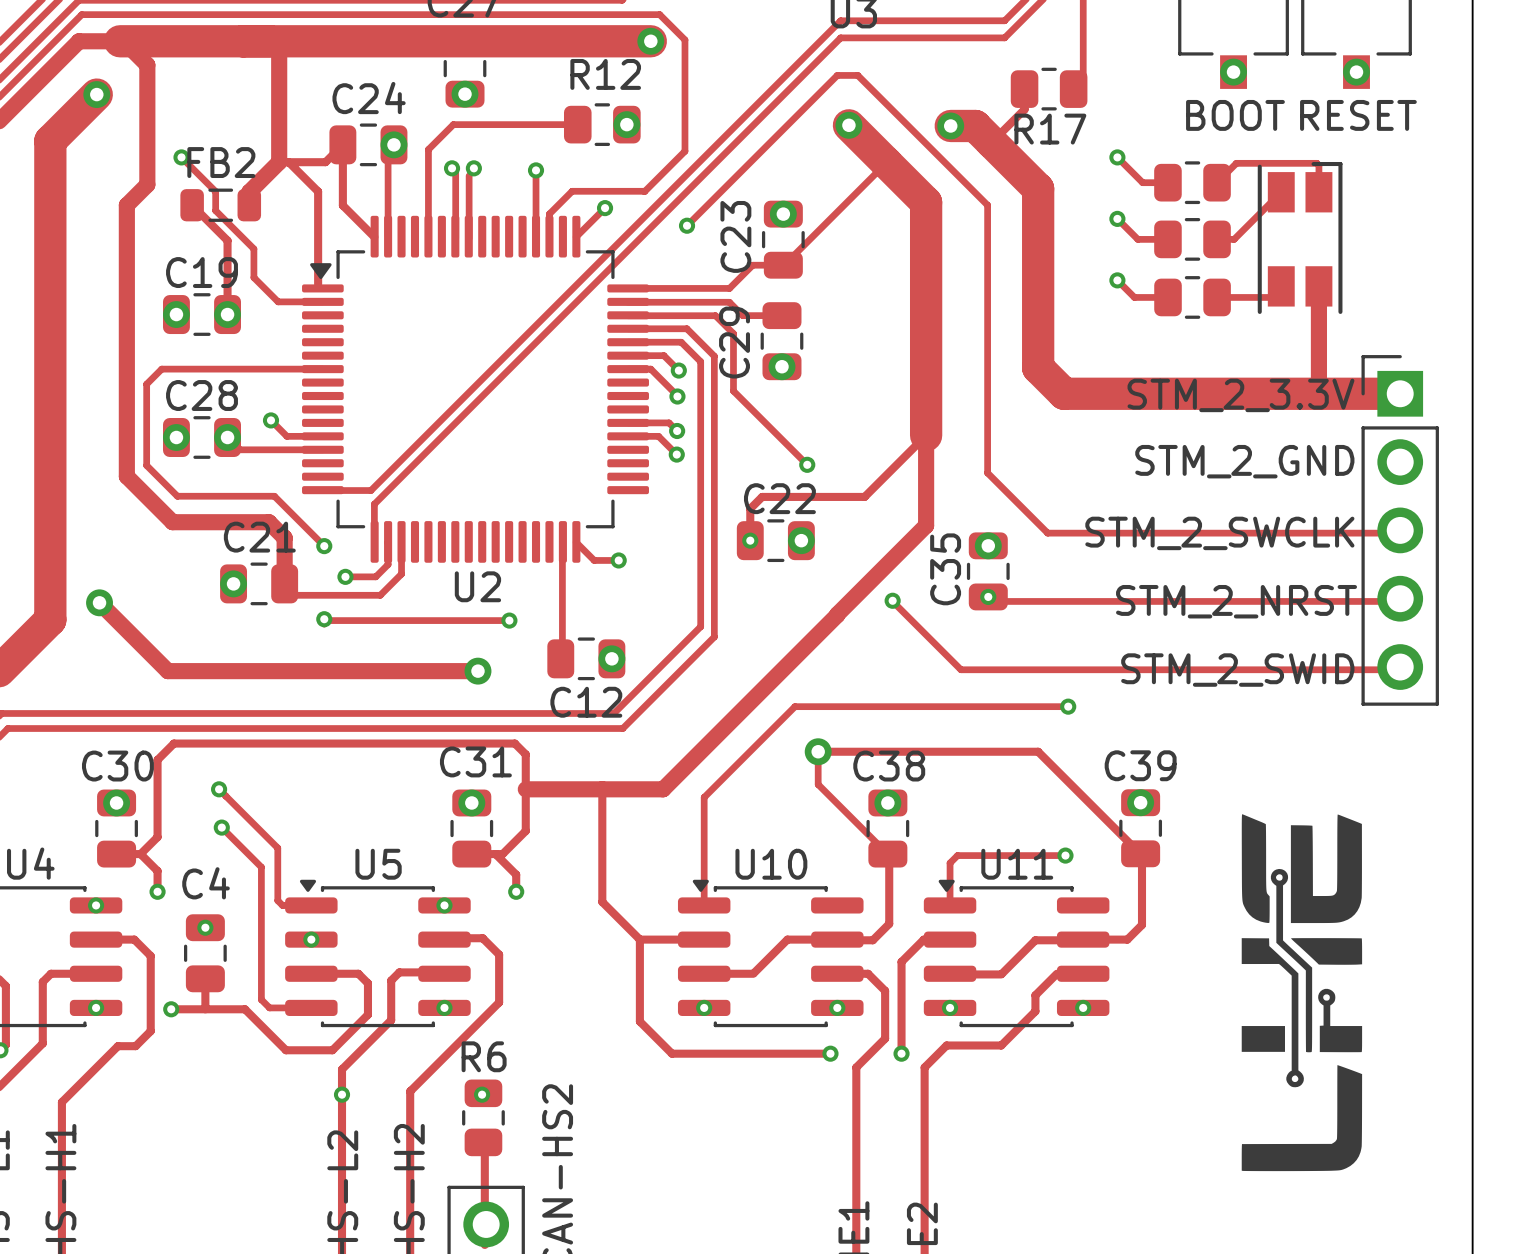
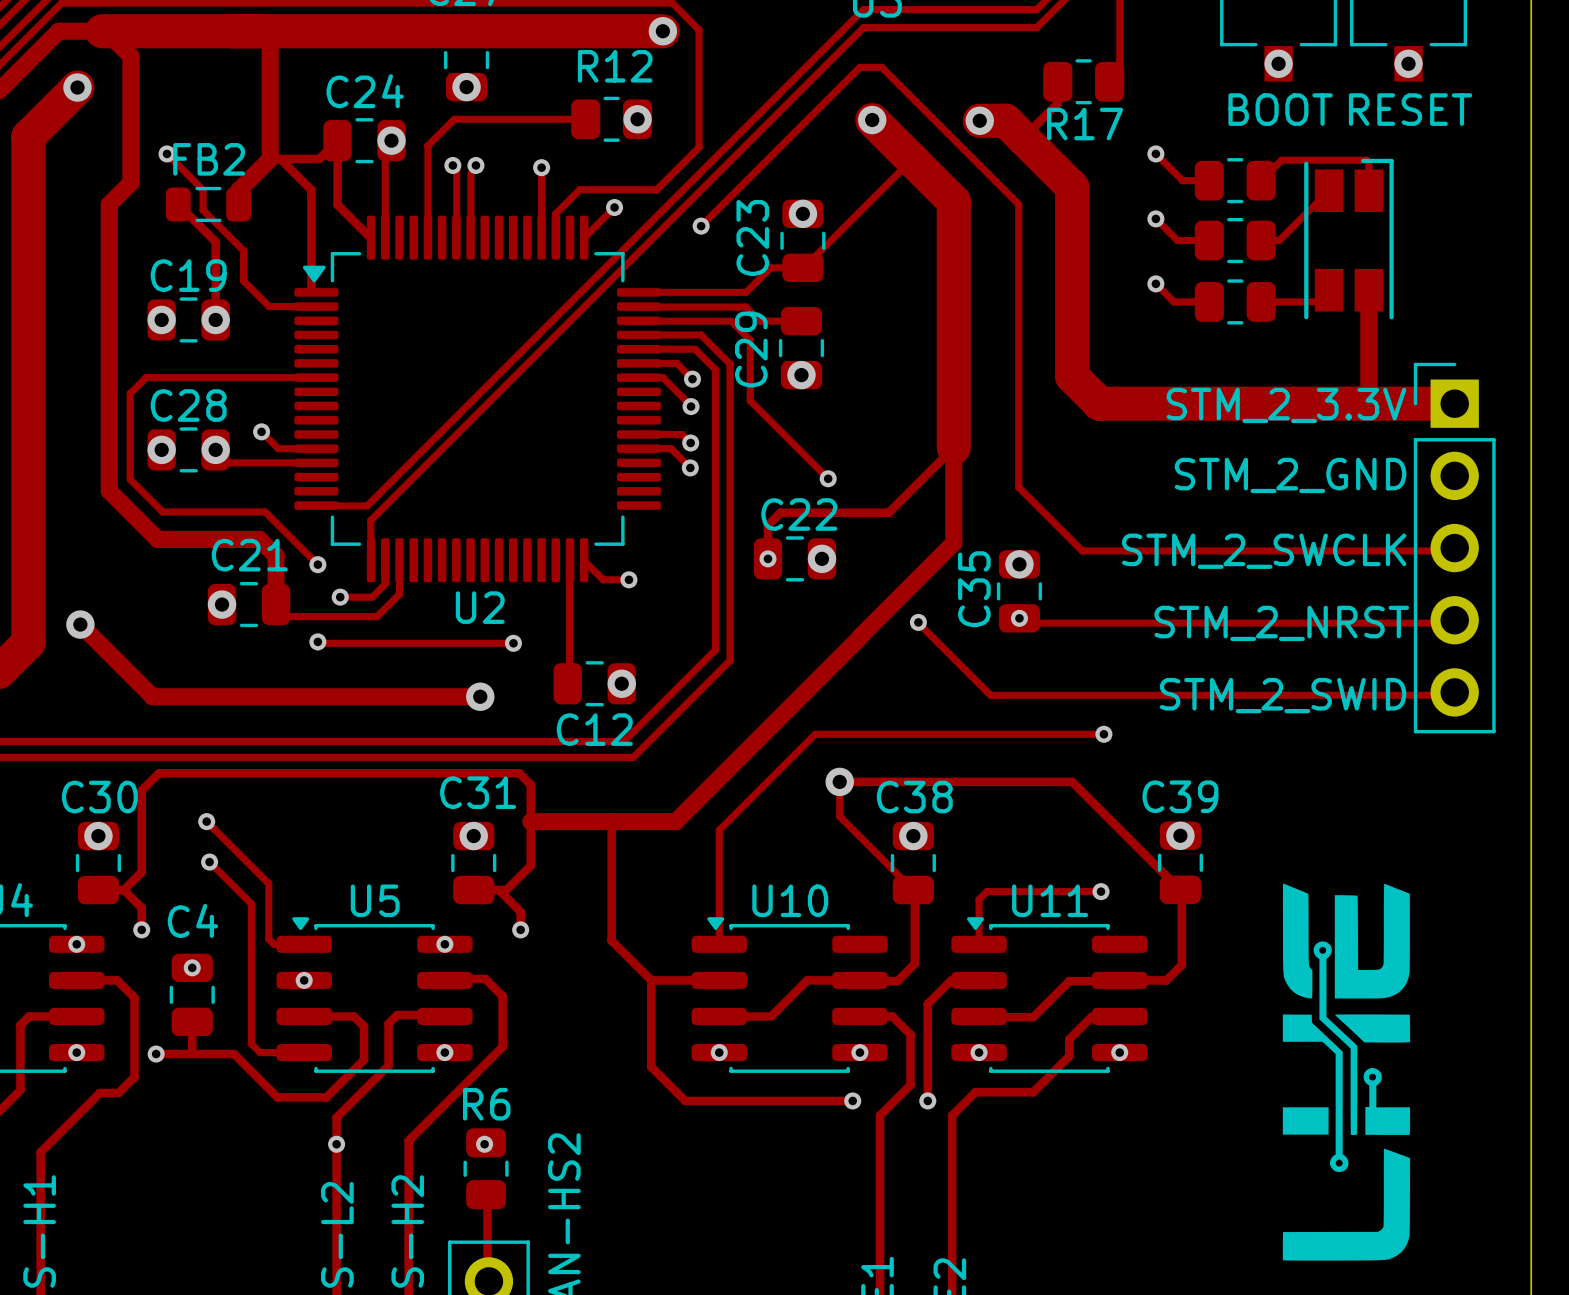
drawing position: (1301, 992) -> (1346, 1072)

